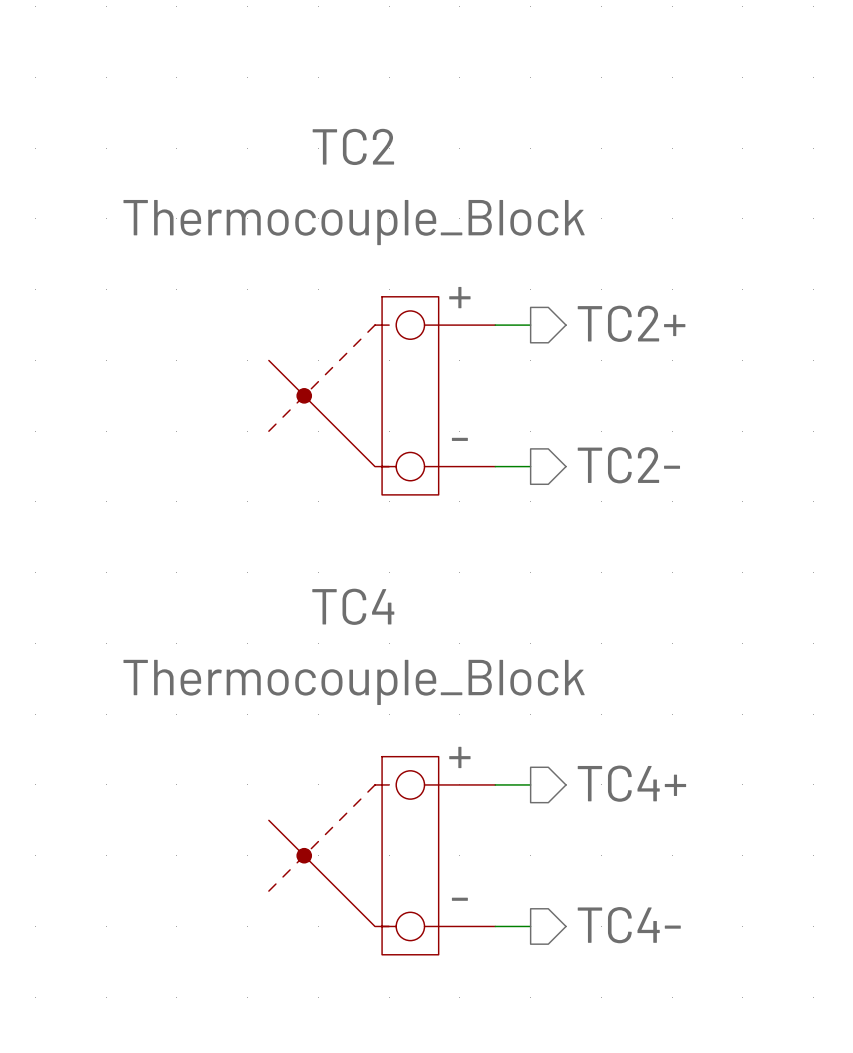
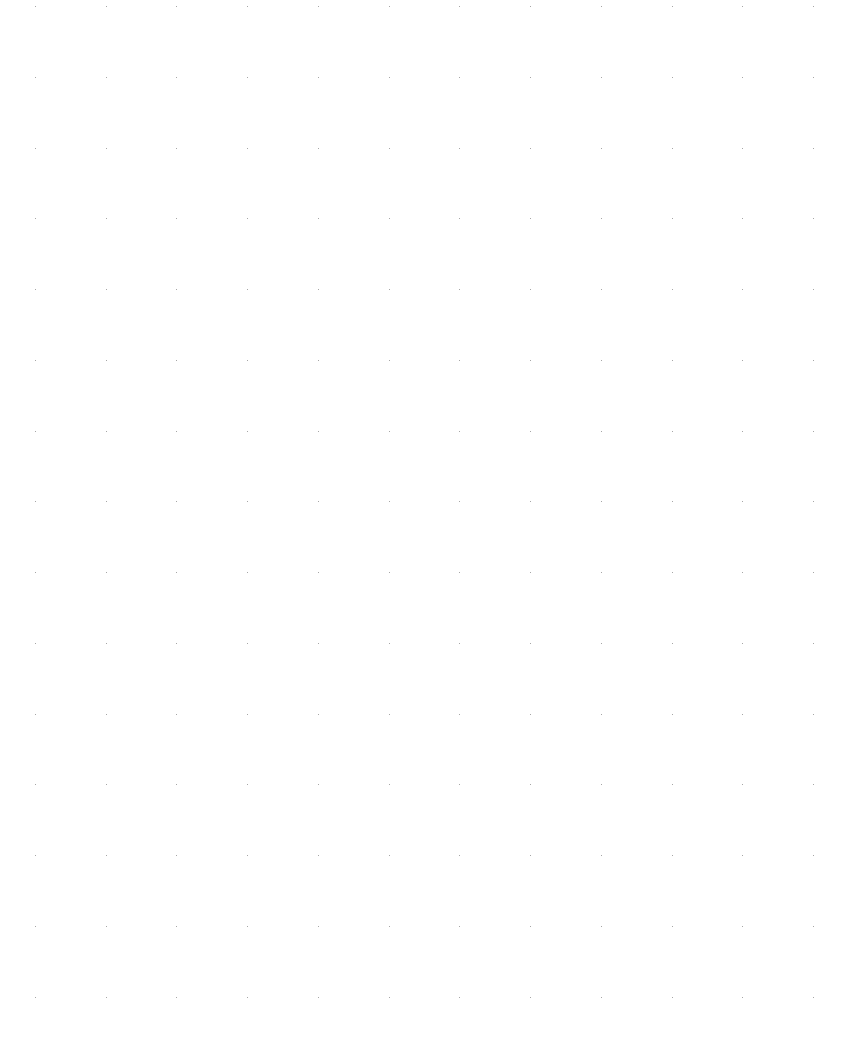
hierarchical label: TC2+ (631, 323) -> none
wire: (495, 325) (530, 325) -> none
TC2: Thermocouple_Block (382, 395) -> none
hierarchical label: TC2- (628, 465) -> none
wire: (495, 466) (530, 466) -> none
hierarchical label: TC4+ (631, 783) -> none
wire: (495, 784) (530, 784) -> none
TC4: Thermocouple_Block (382, 855) -> none
hierarchical label: TC4- (629, 925) -> none
wire: (495, 926) (530, 926) -> none

